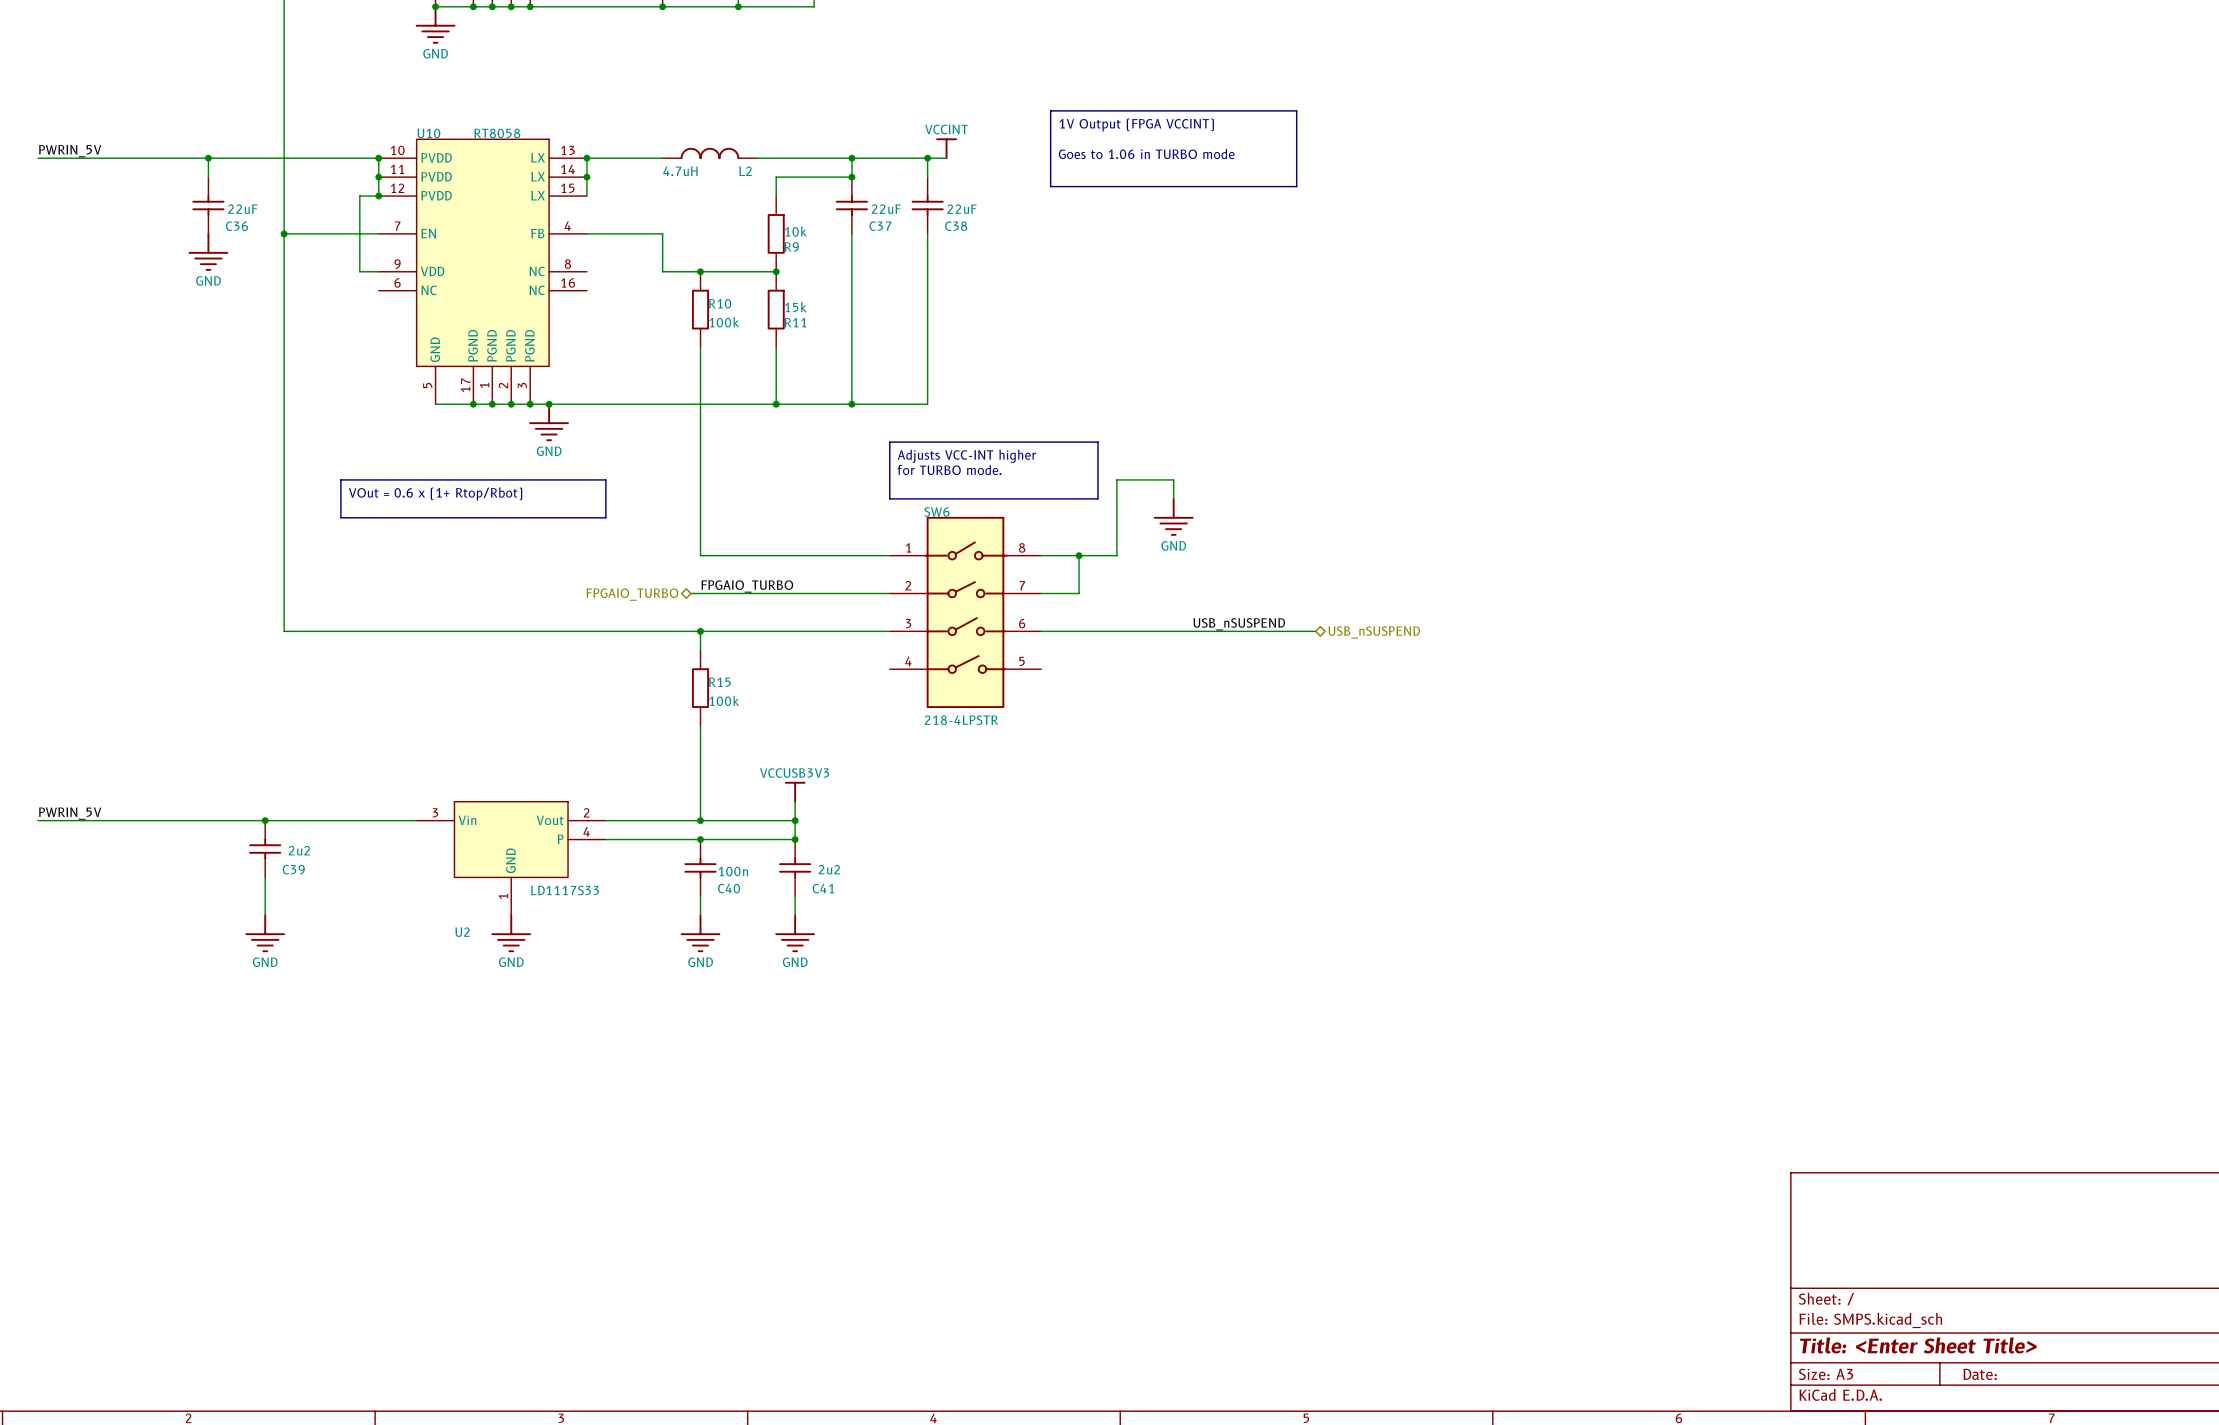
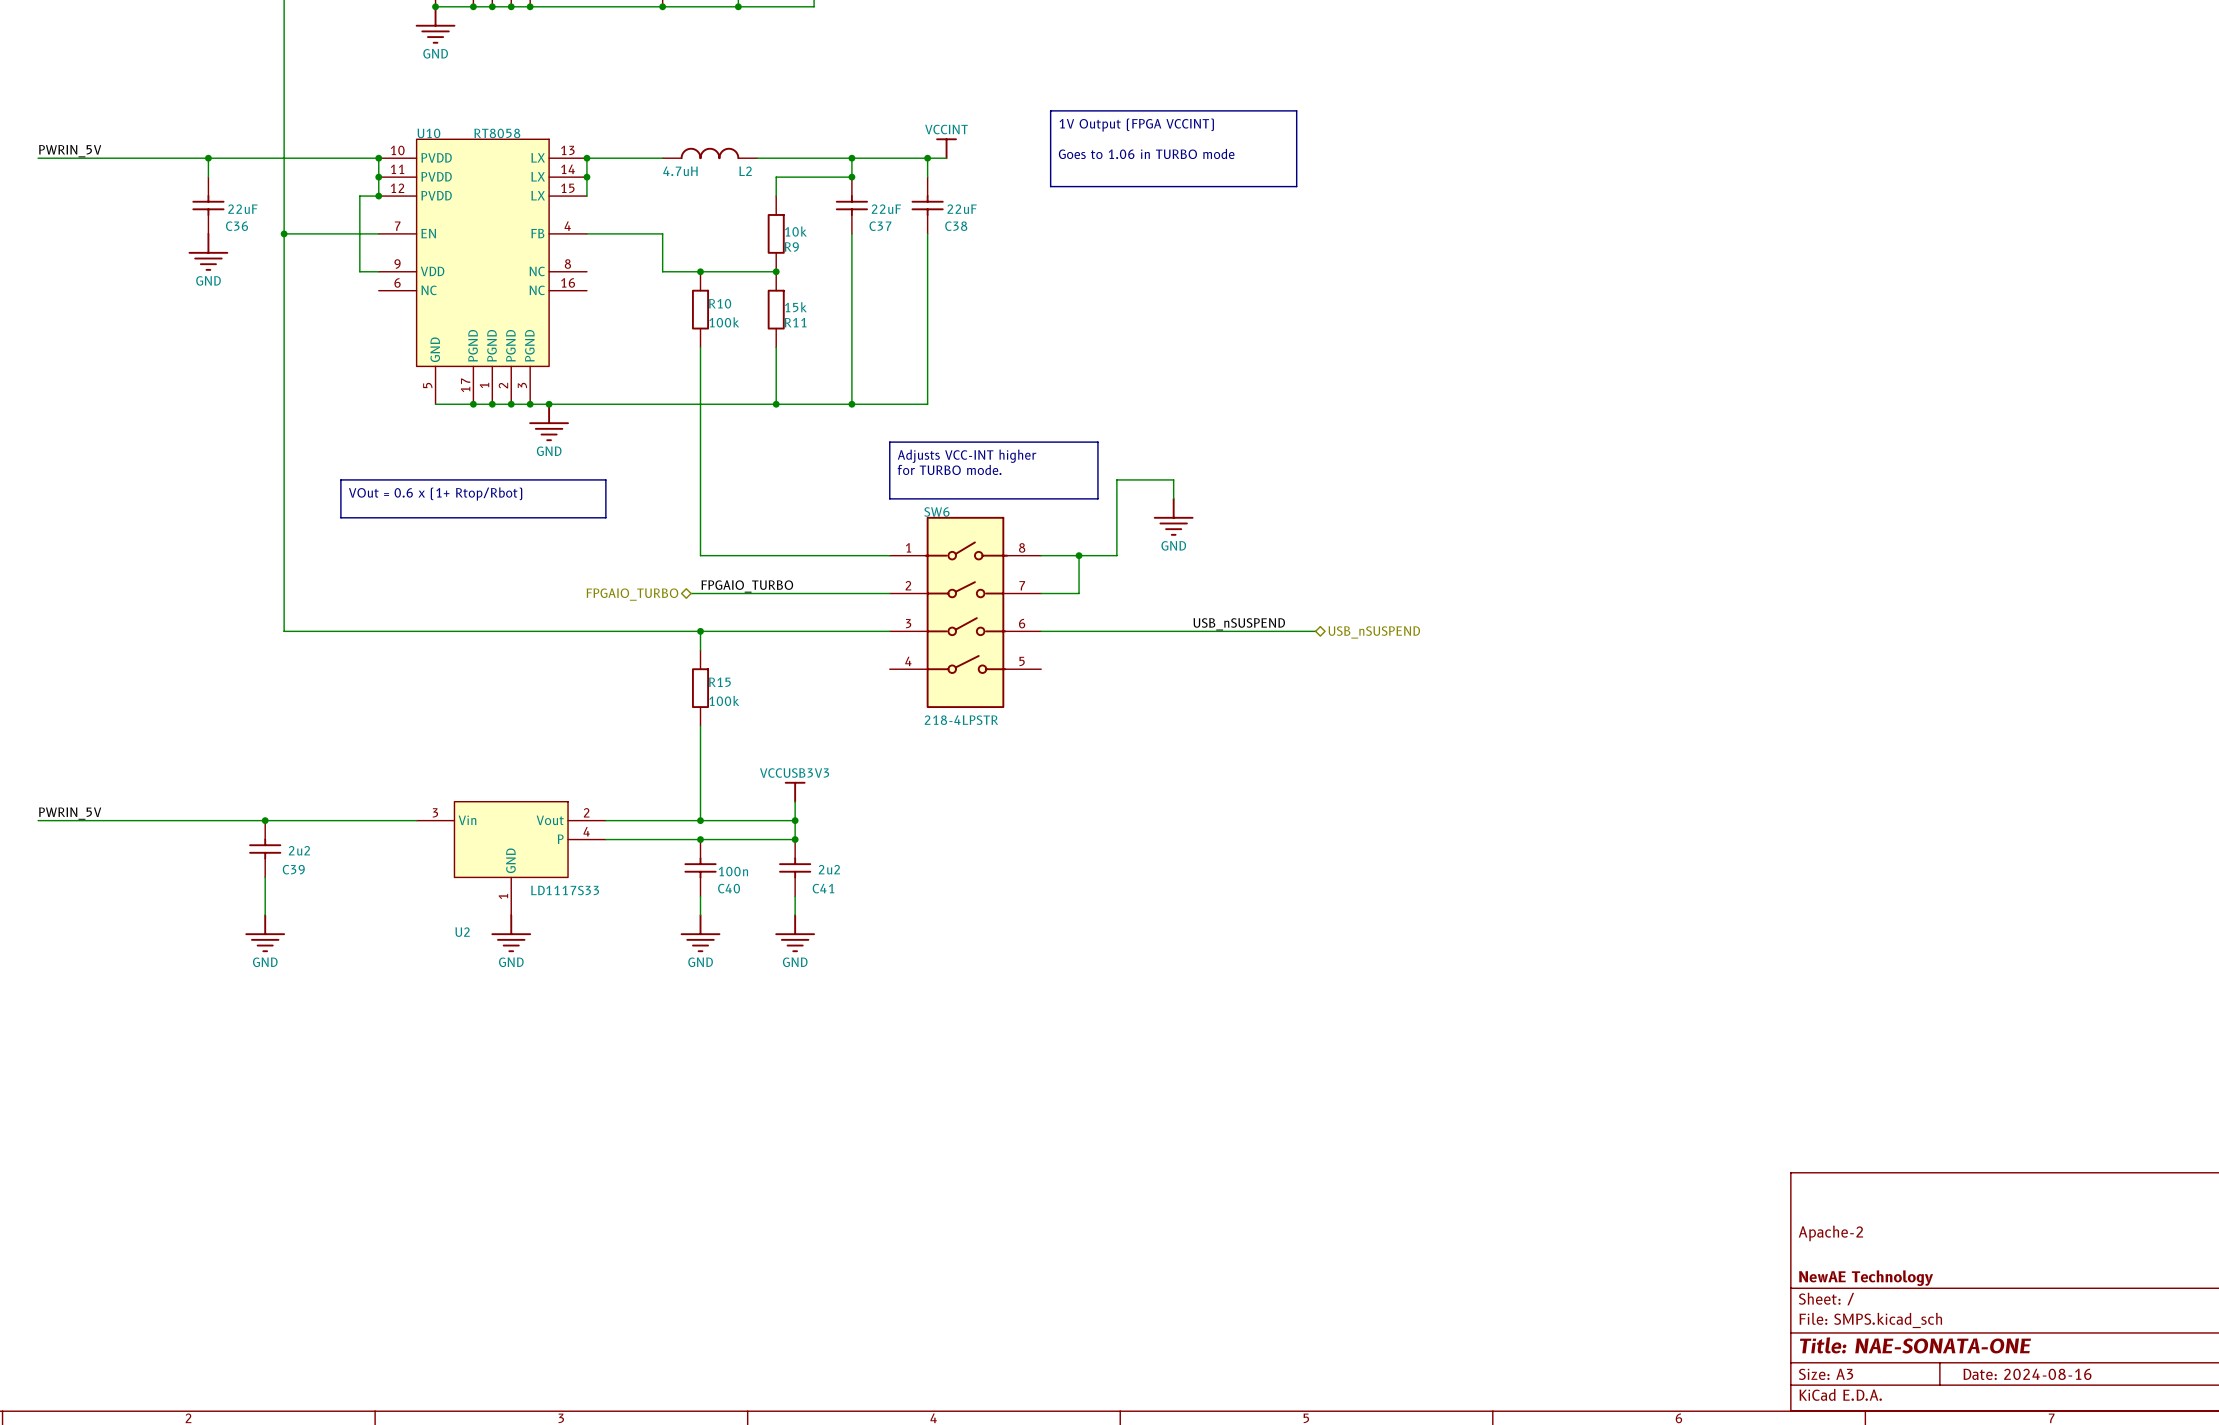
title block: none -> Apache-2 (1830, 1233)
title block: none -> NewAE Technology (1866, 1278)
title block: Title: <Enter Sheet Title> (1918, 1345) -> Title: NAE-SONATA-ONE (1915, 1345)
title block: Date: (1980, 1374) -> Date: 2024-08-16 (2027, 1374)

